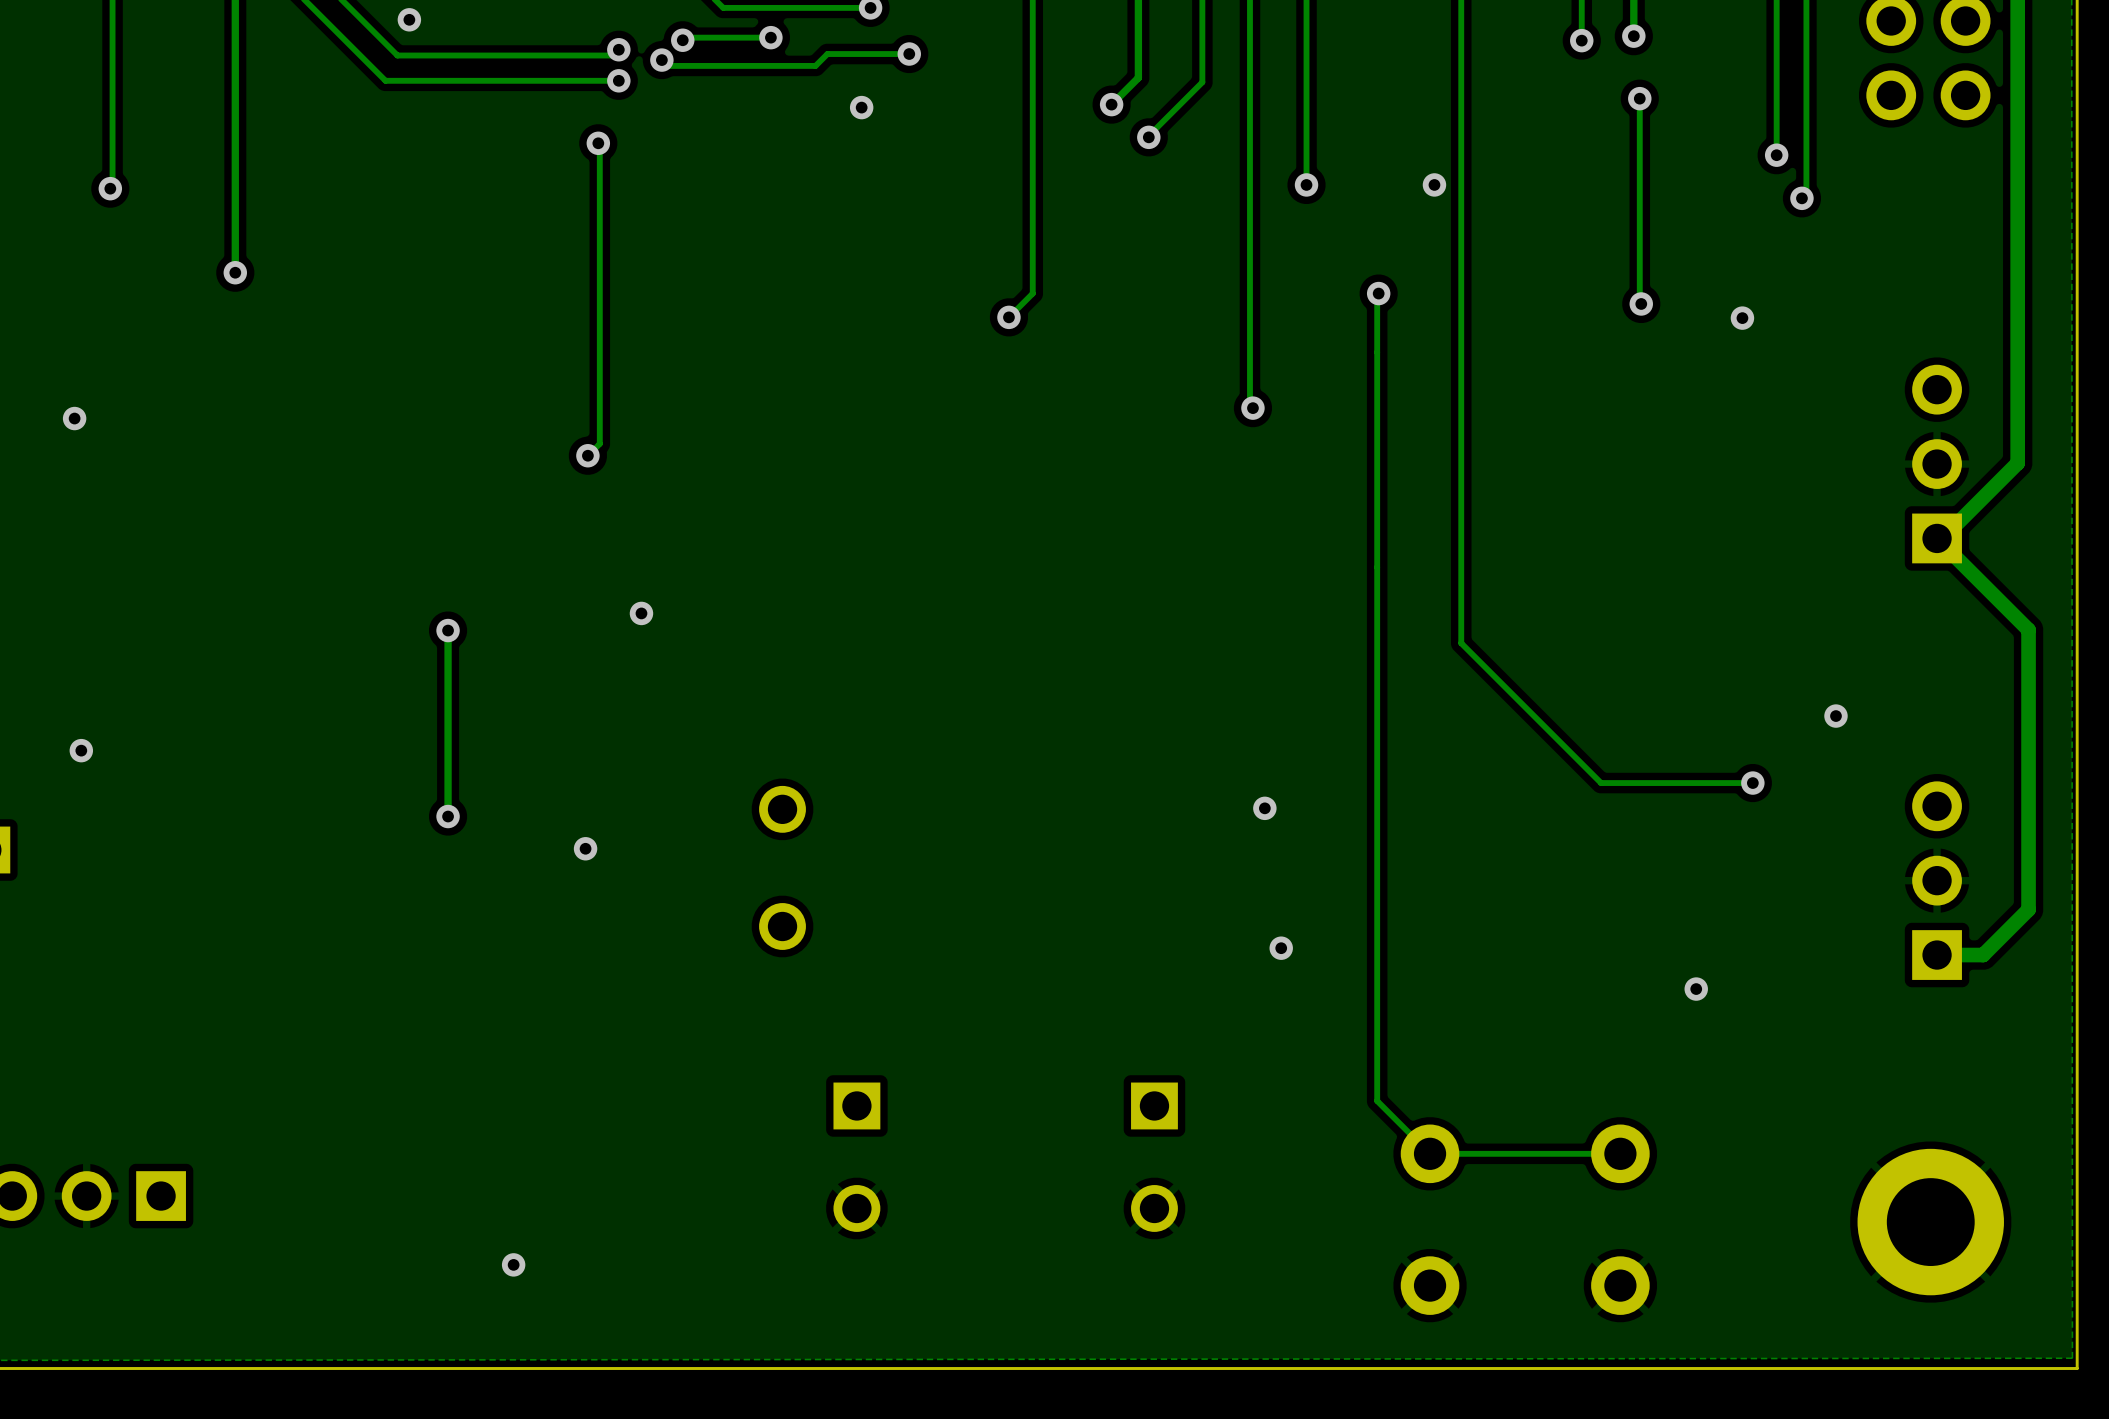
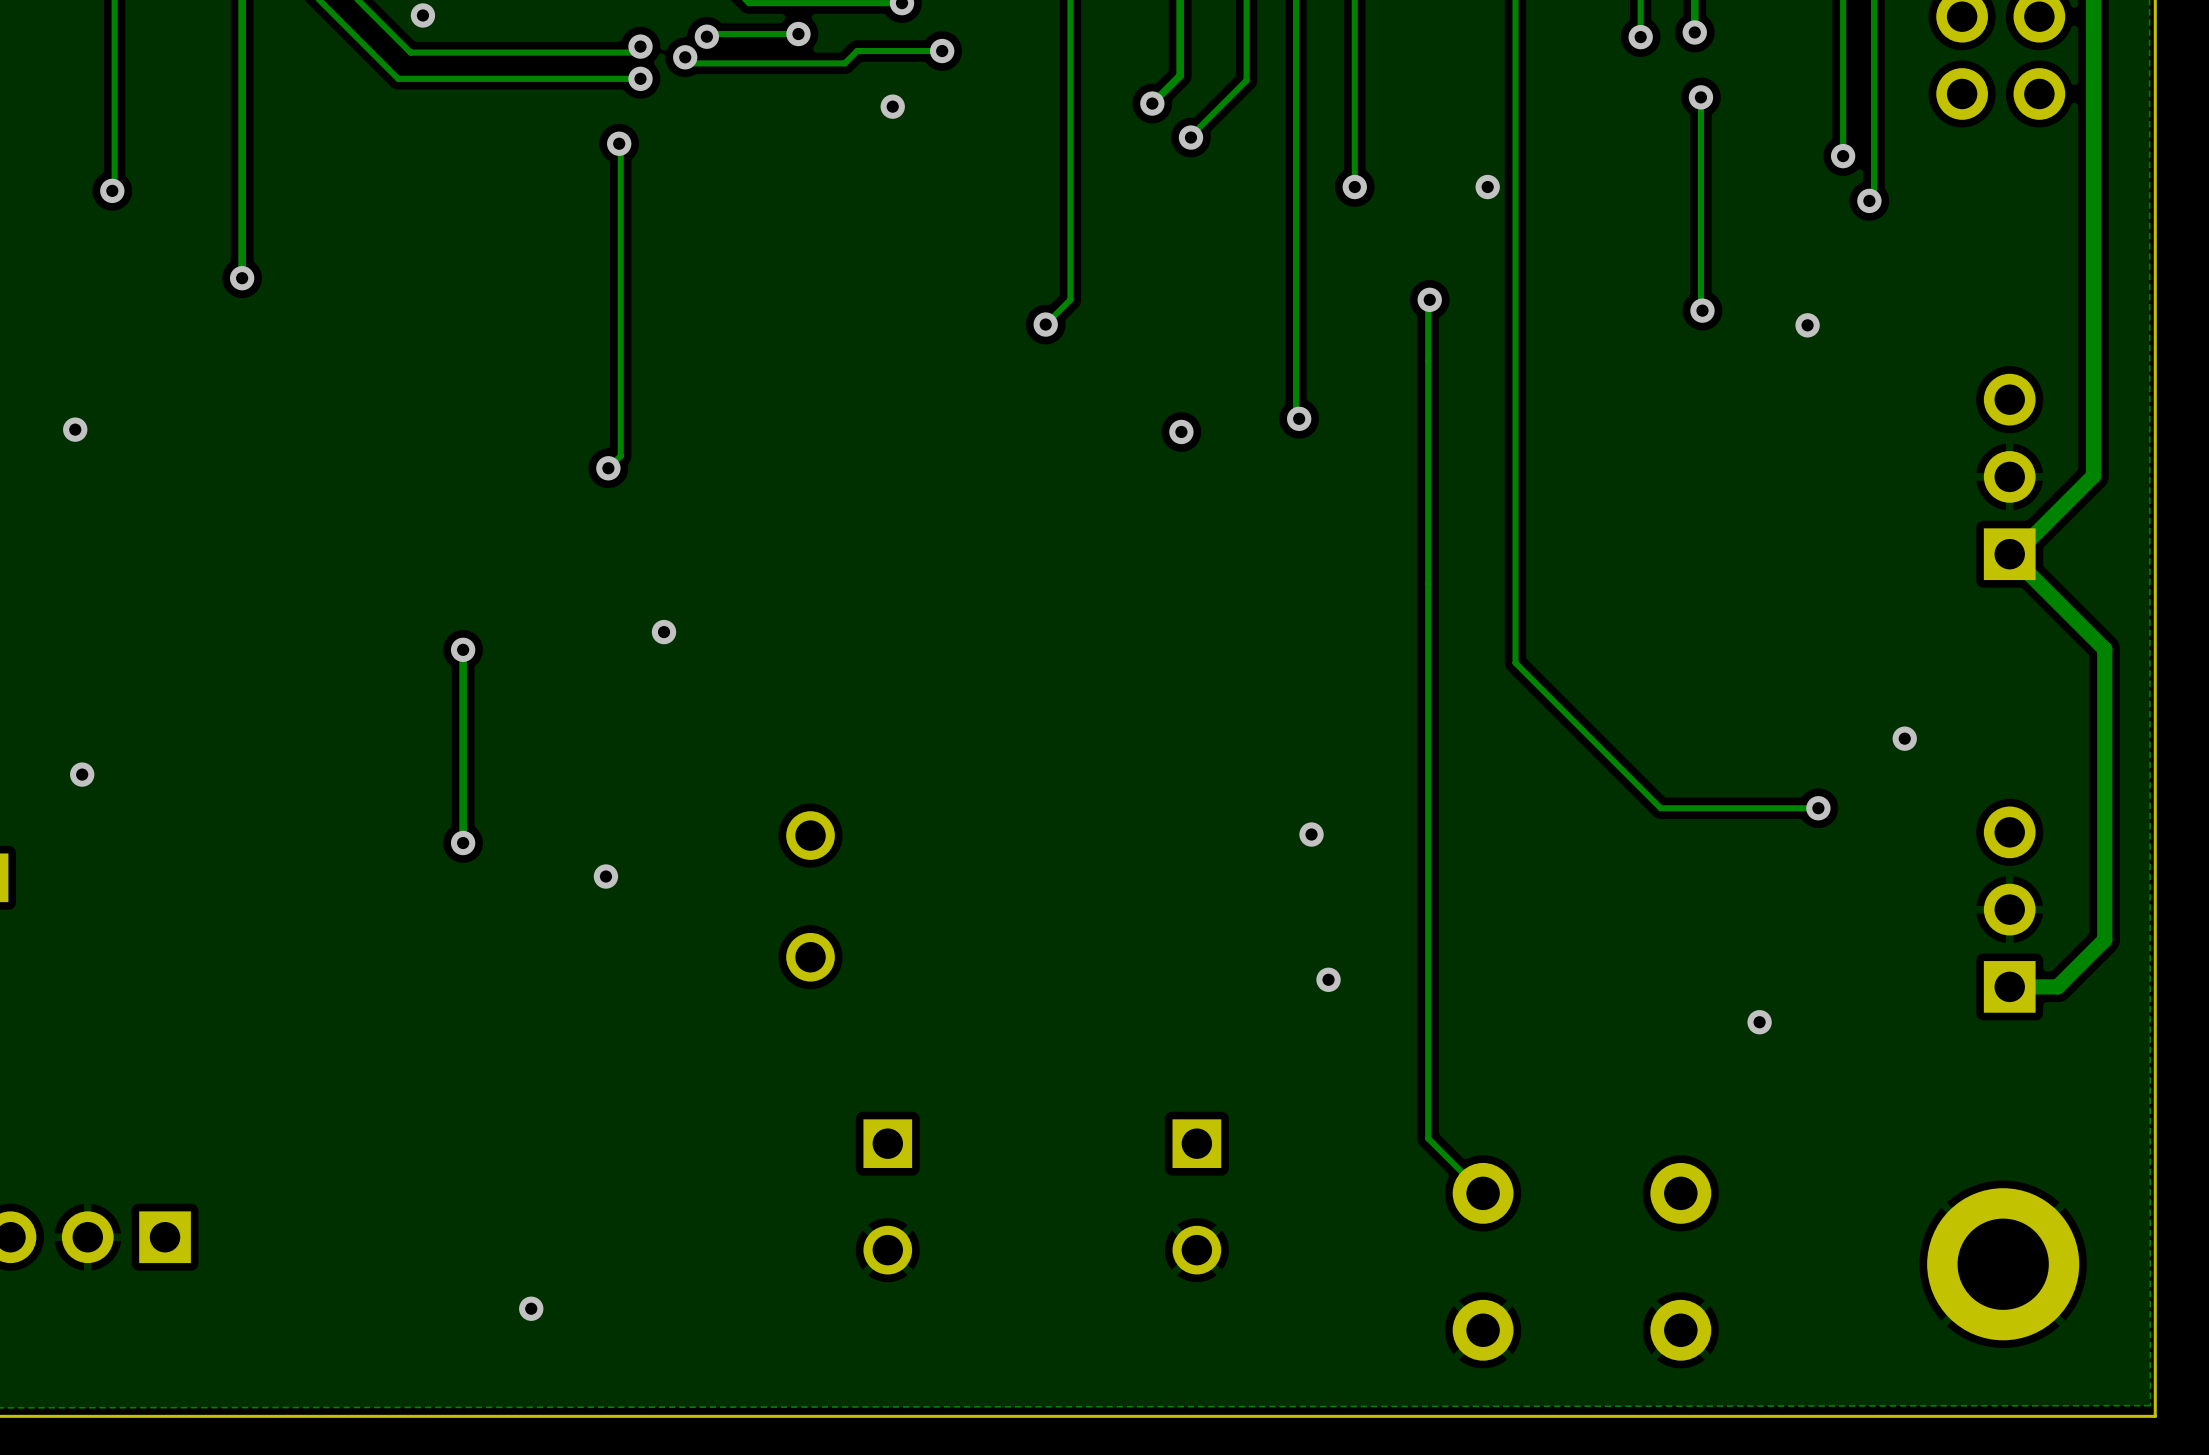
via: none -> (1181, 431)
track: (1620, 1153) (1430, 1153) -> none

